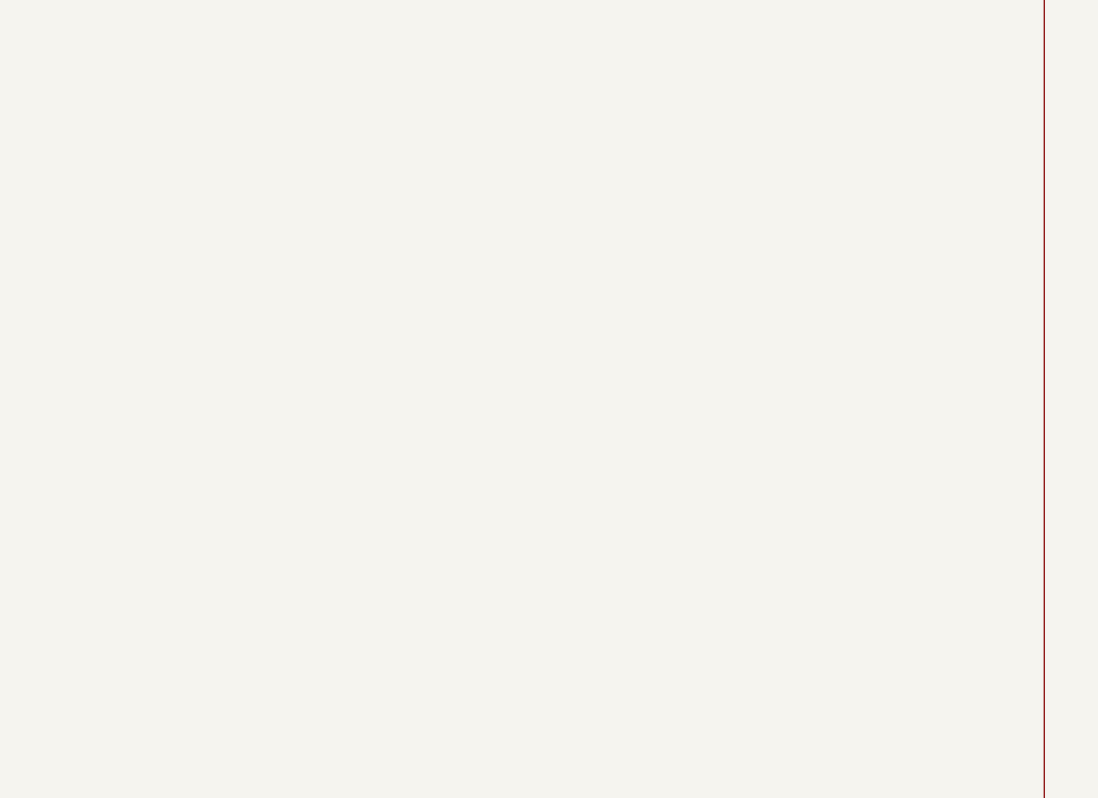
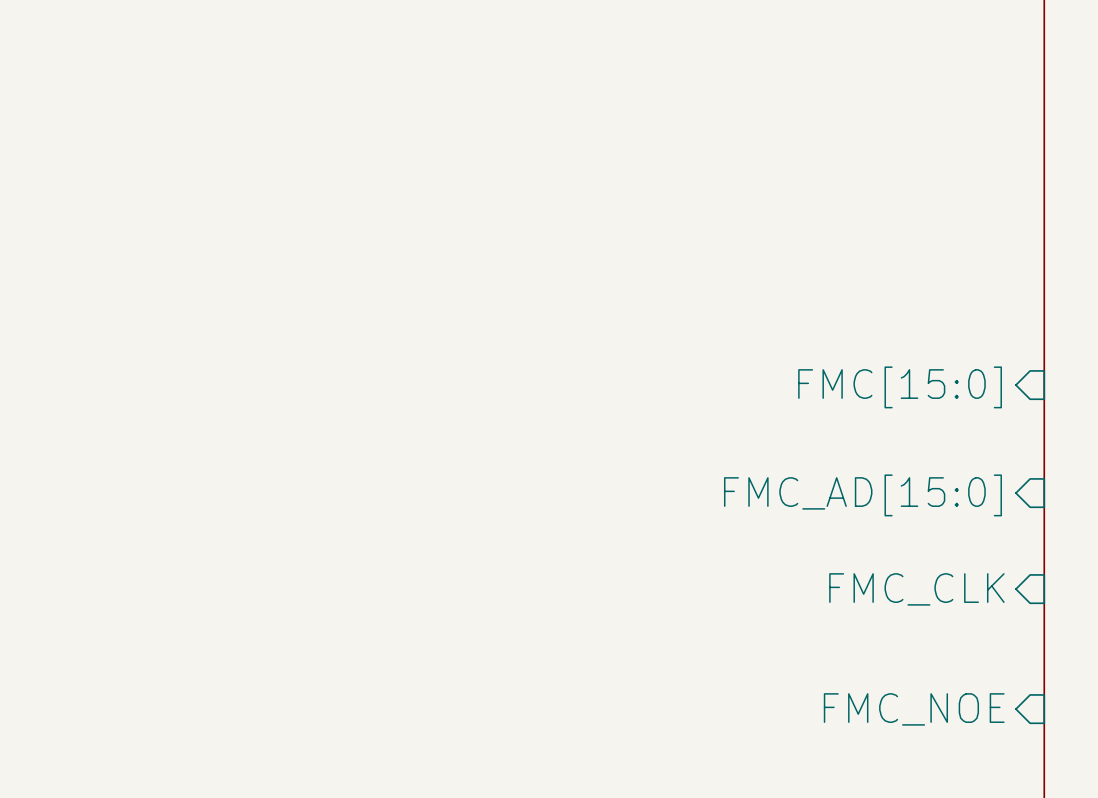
sheet pin: none -> FMC[15:0] (900, 387)
sheet pin: none -> FMC_AD[15:0] (862, 495)
sheet pin: none -> FMC_CLK (916, 589)
sheet pin: none -> FMC_NOE (914, 709)

